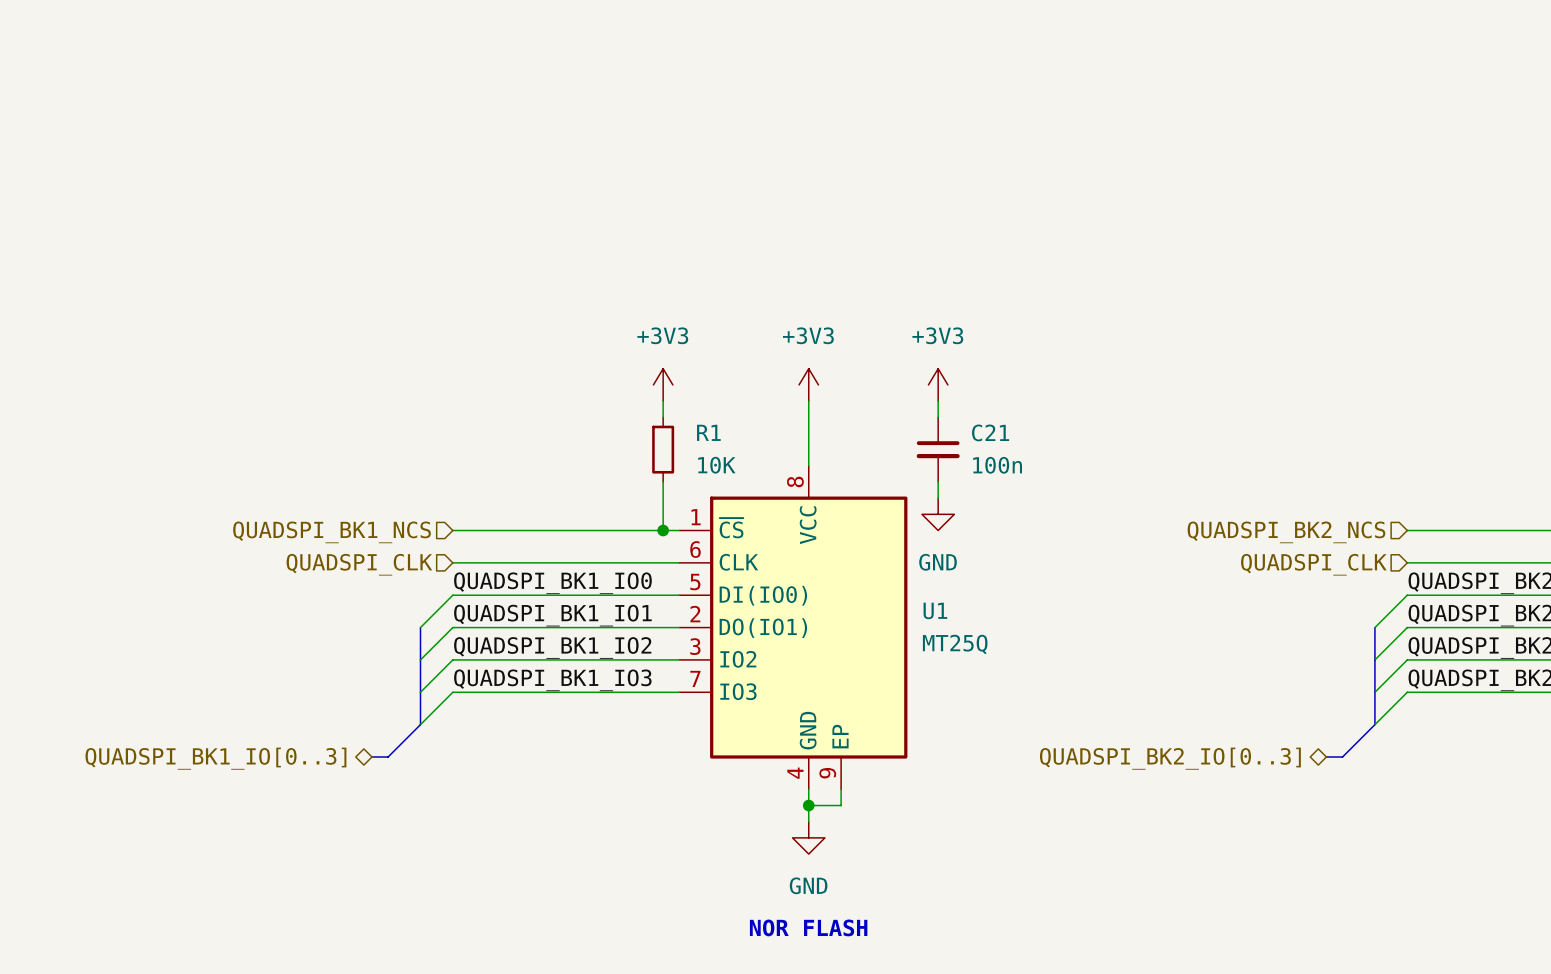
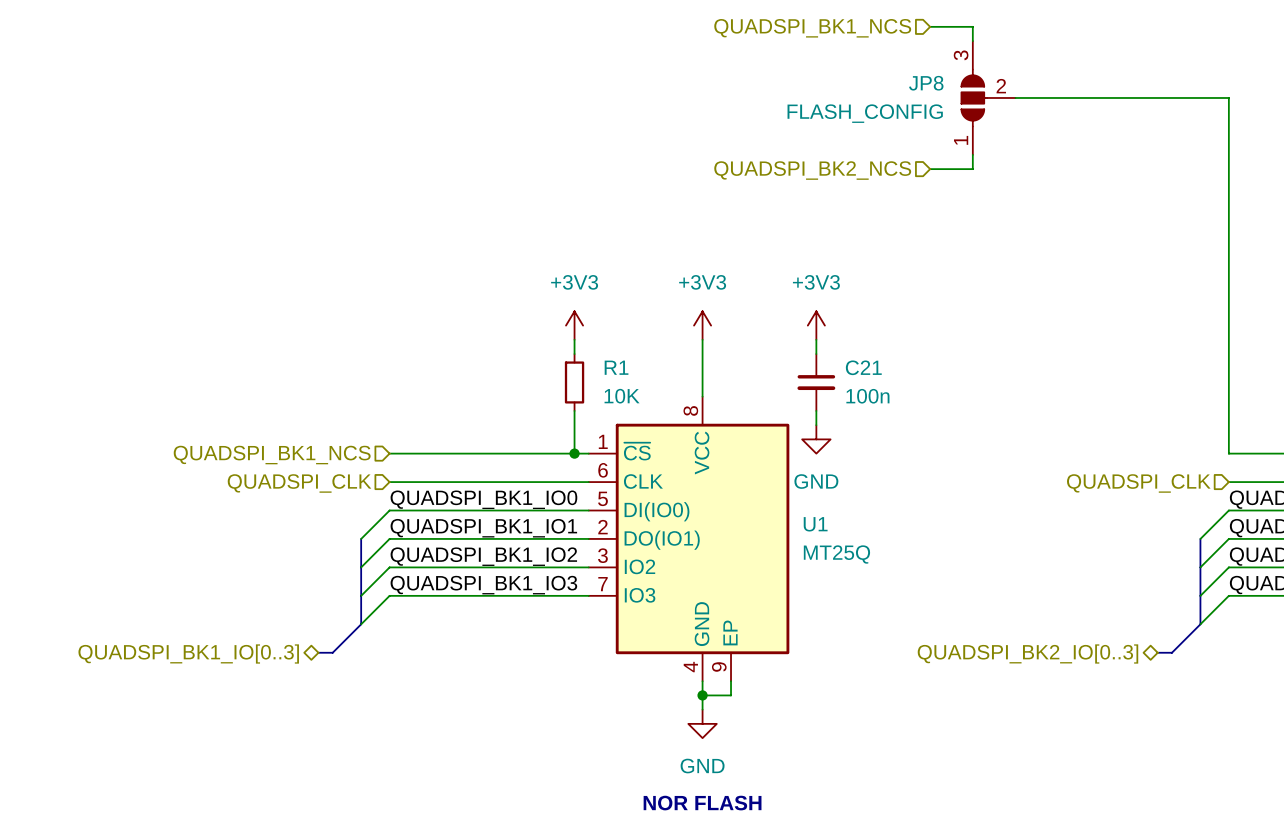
wire: none -> (930, 26) (972, 26) (972, 41)
hierarchical label: none -> QUADSPI_BK1_NCS (812, 28)
JP8: none -> FLASH_CONFIG (988, 97)
wire: none -> (1015, 97) (1228, 97) (1228, 453)
wire: none -> (972, 154) (972, 169) (930, 169)
hierarchical label: none -> QUADSPI_BK2_NCS (812, 170)
hierarchical label: QUADSPI_BK2_NCS (1286, 532) -> none

